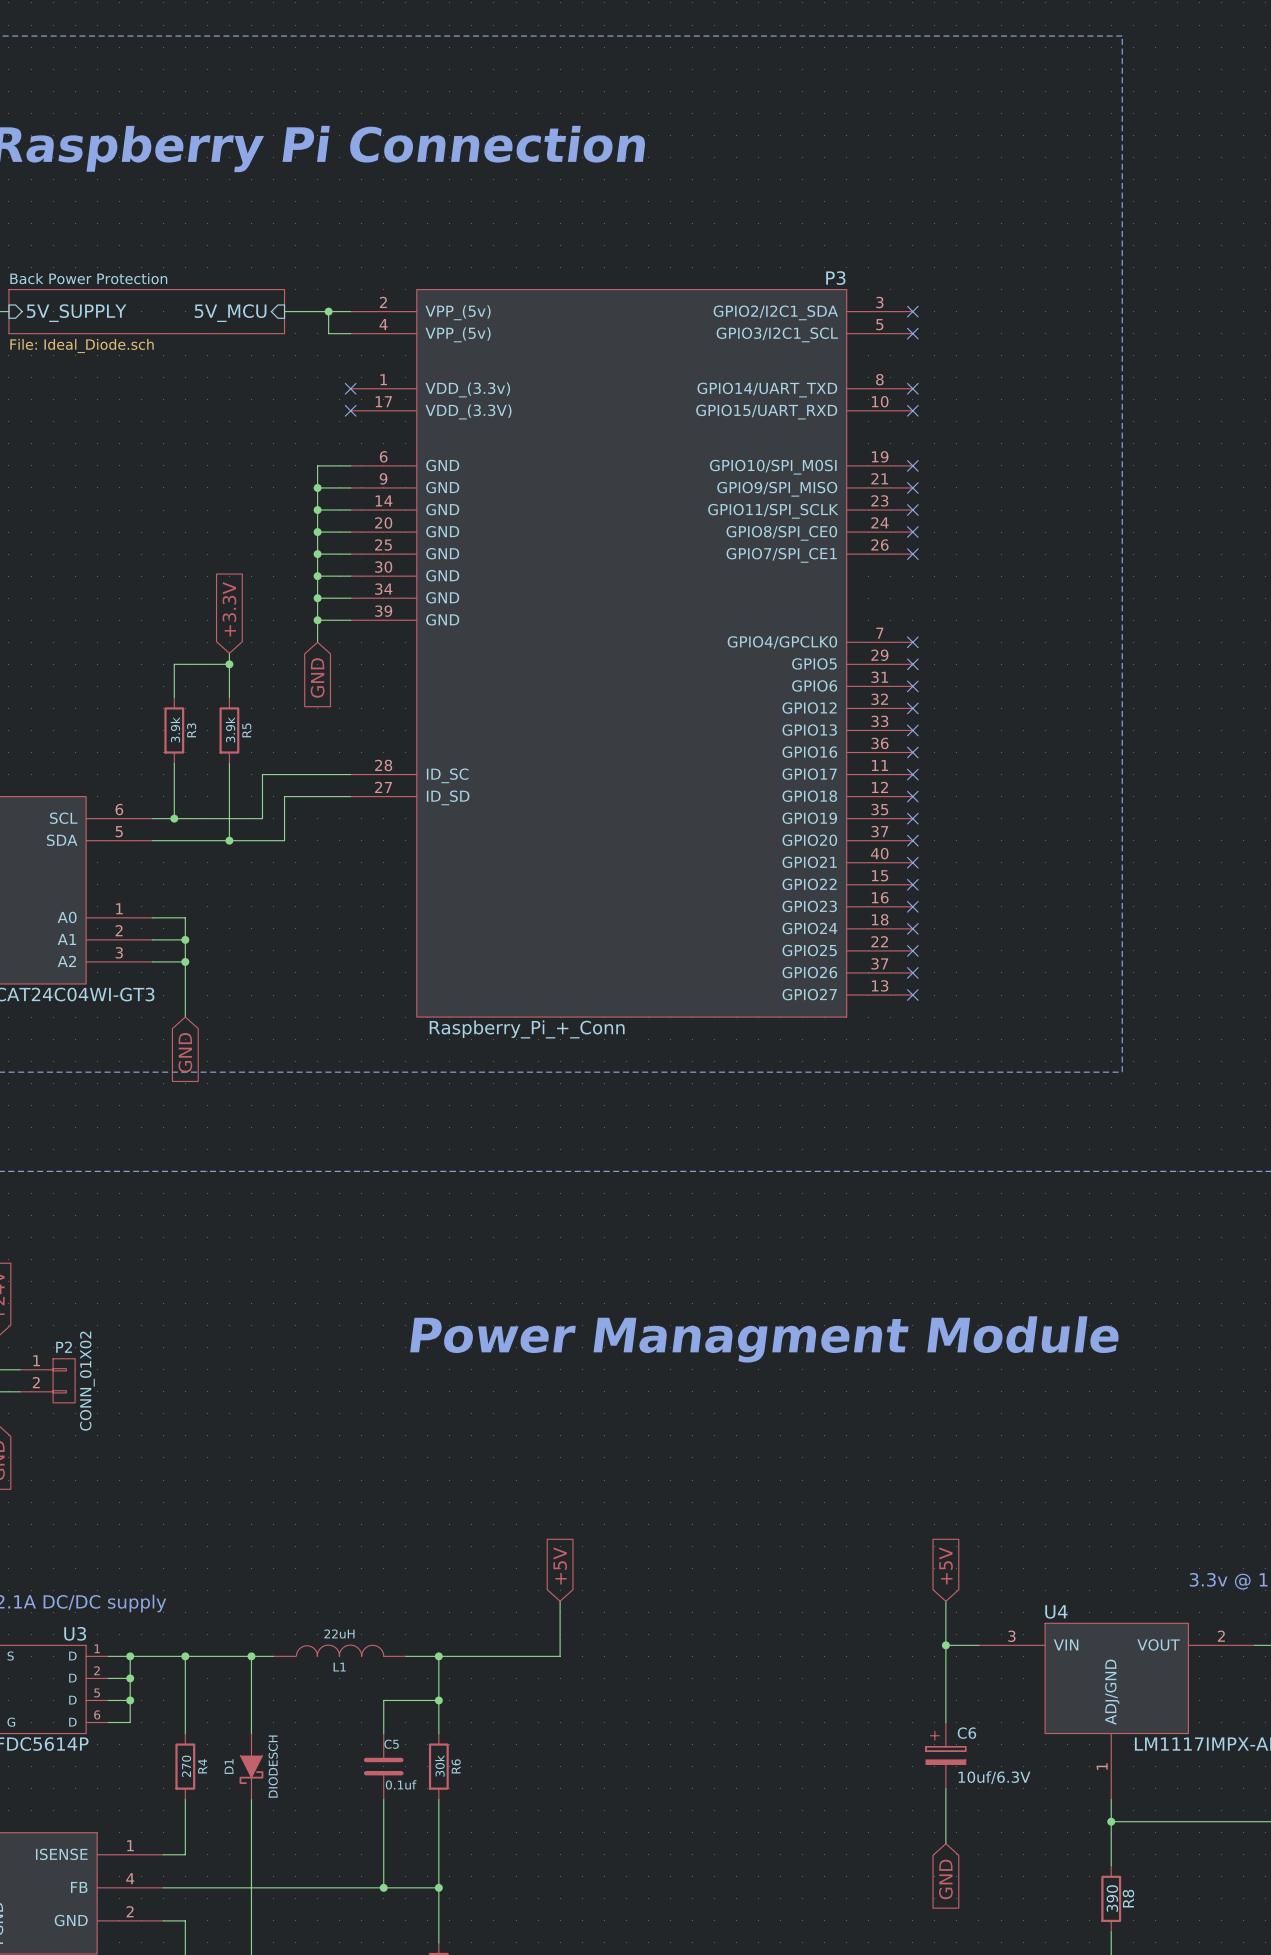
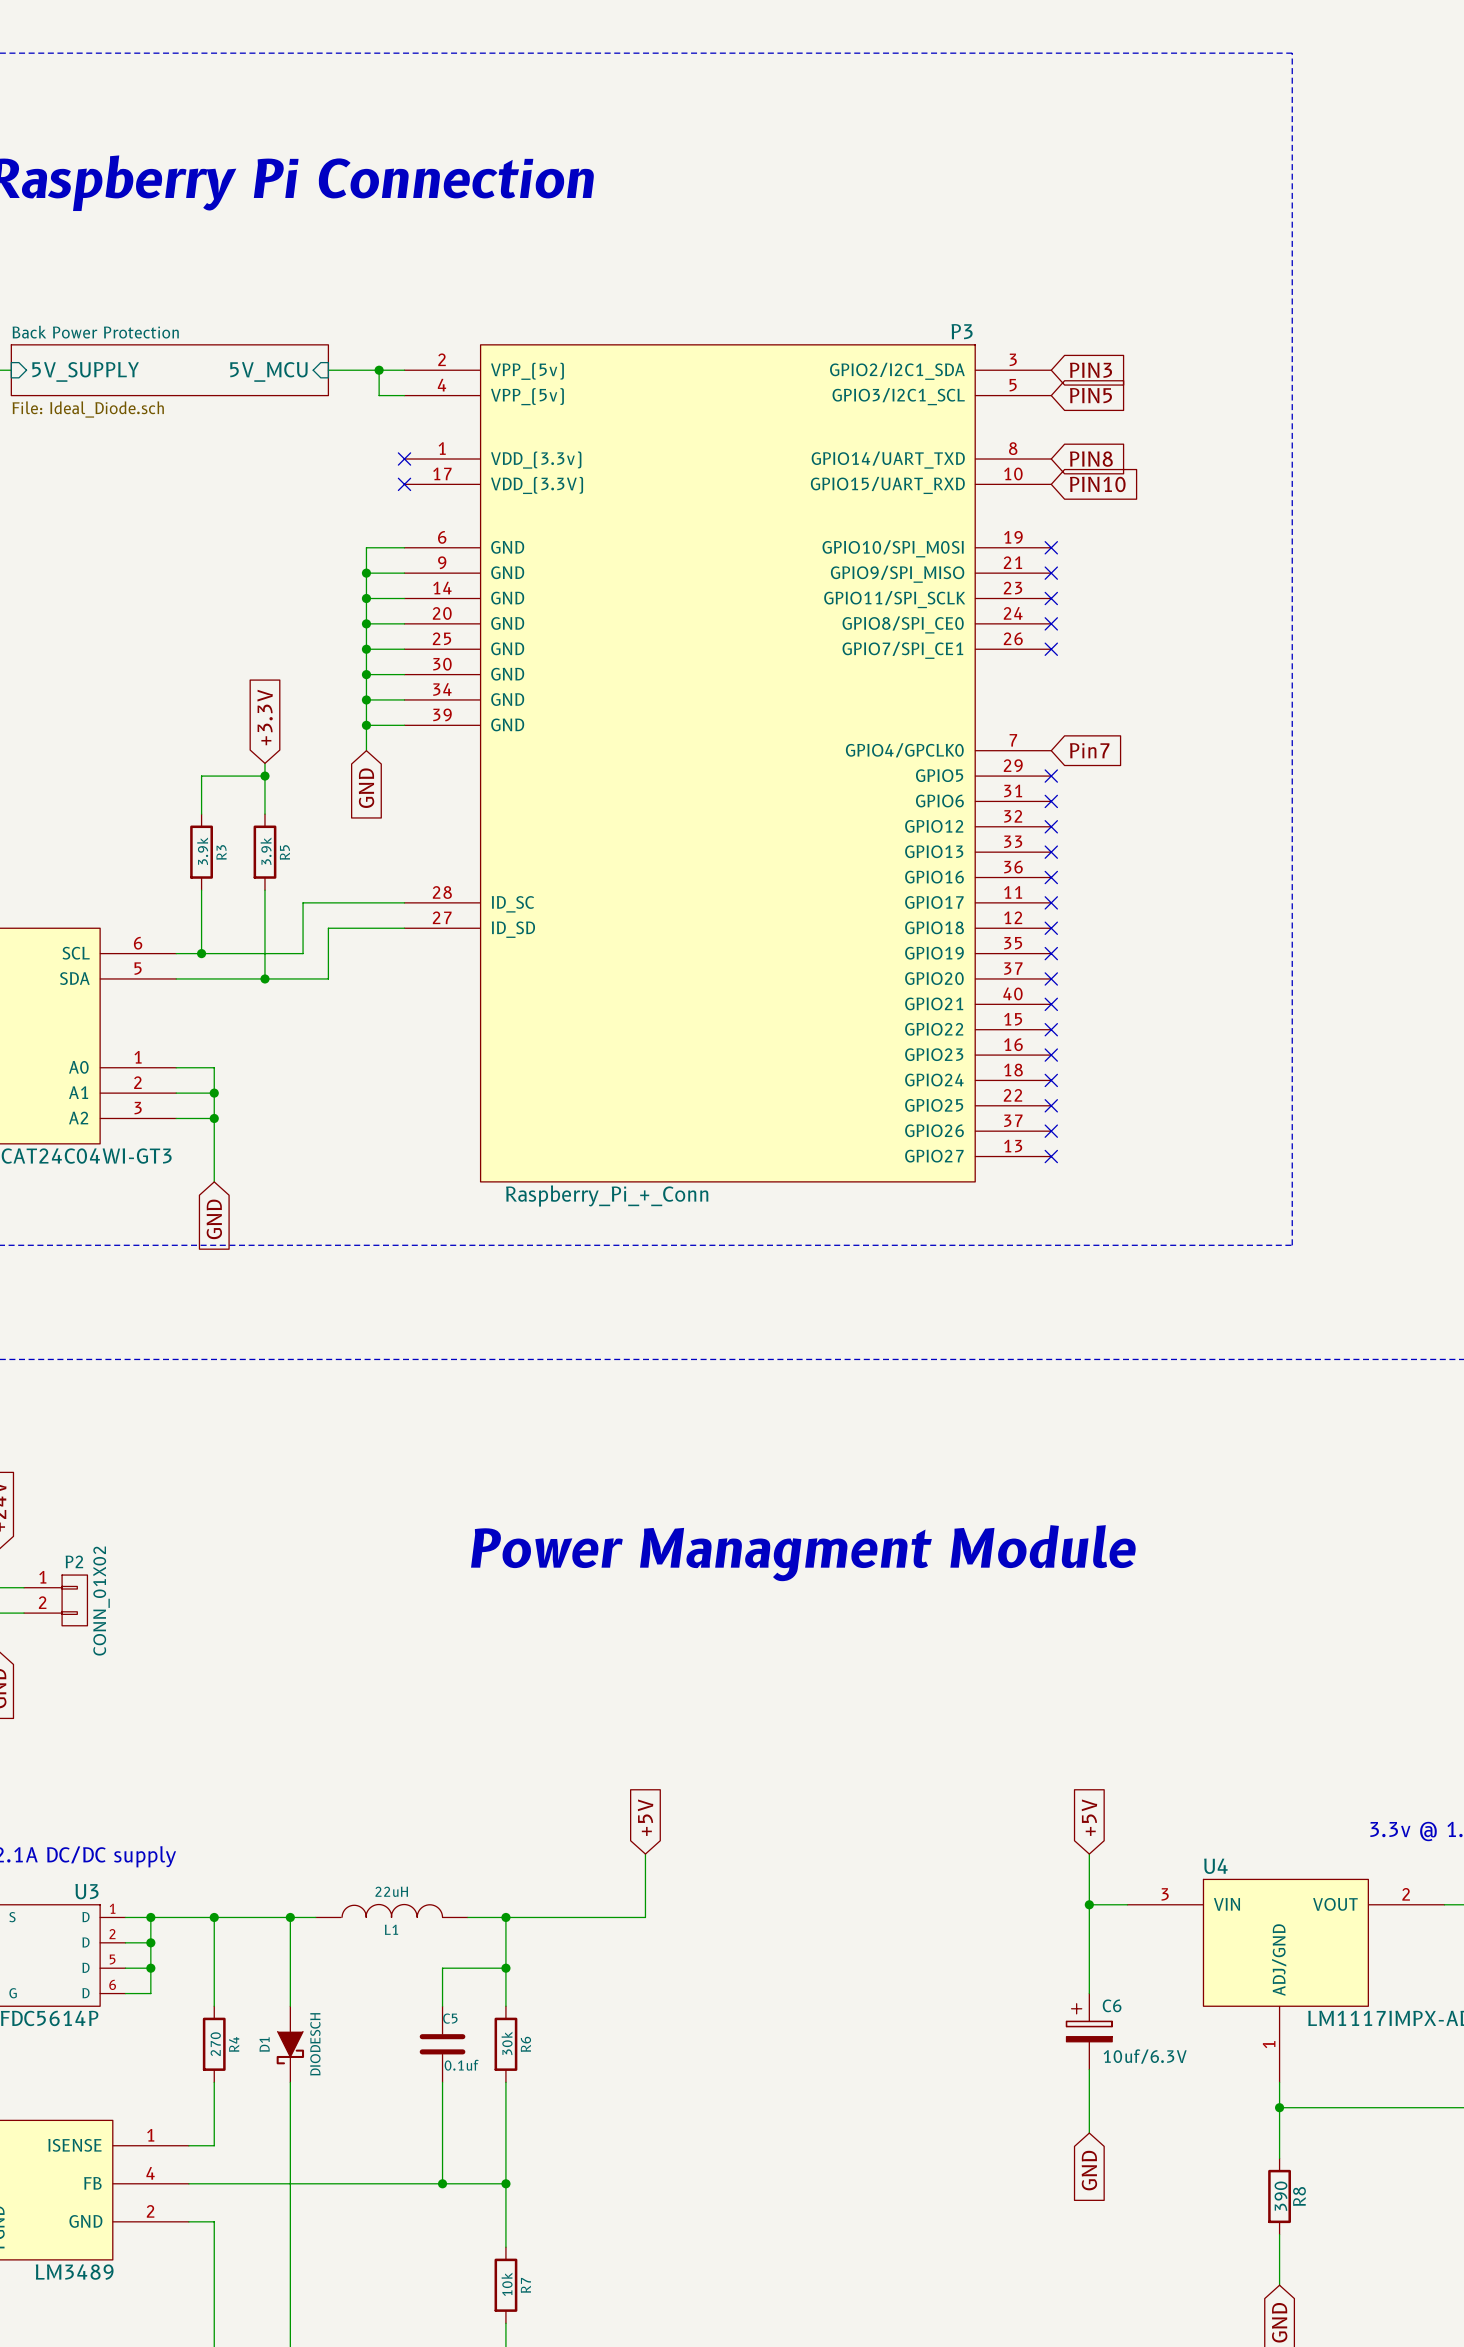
no-connect mark: (912, 311) -> none
global label: none -> PIN3 (1091, 370)
no-connect mark: (912, 333) -> none
global label: none -> PIN5 (1090, 395)
no-connect mark: (912, 388) -> none
global label: none -> PIN8 (1091, 459)
no-connect mark: (912, 410) -> none
global label: none -> PIN10 (1097, 484)
no-connect mark: (912, 642) -> none
global label: none -> Pin7 (1089, 750)

